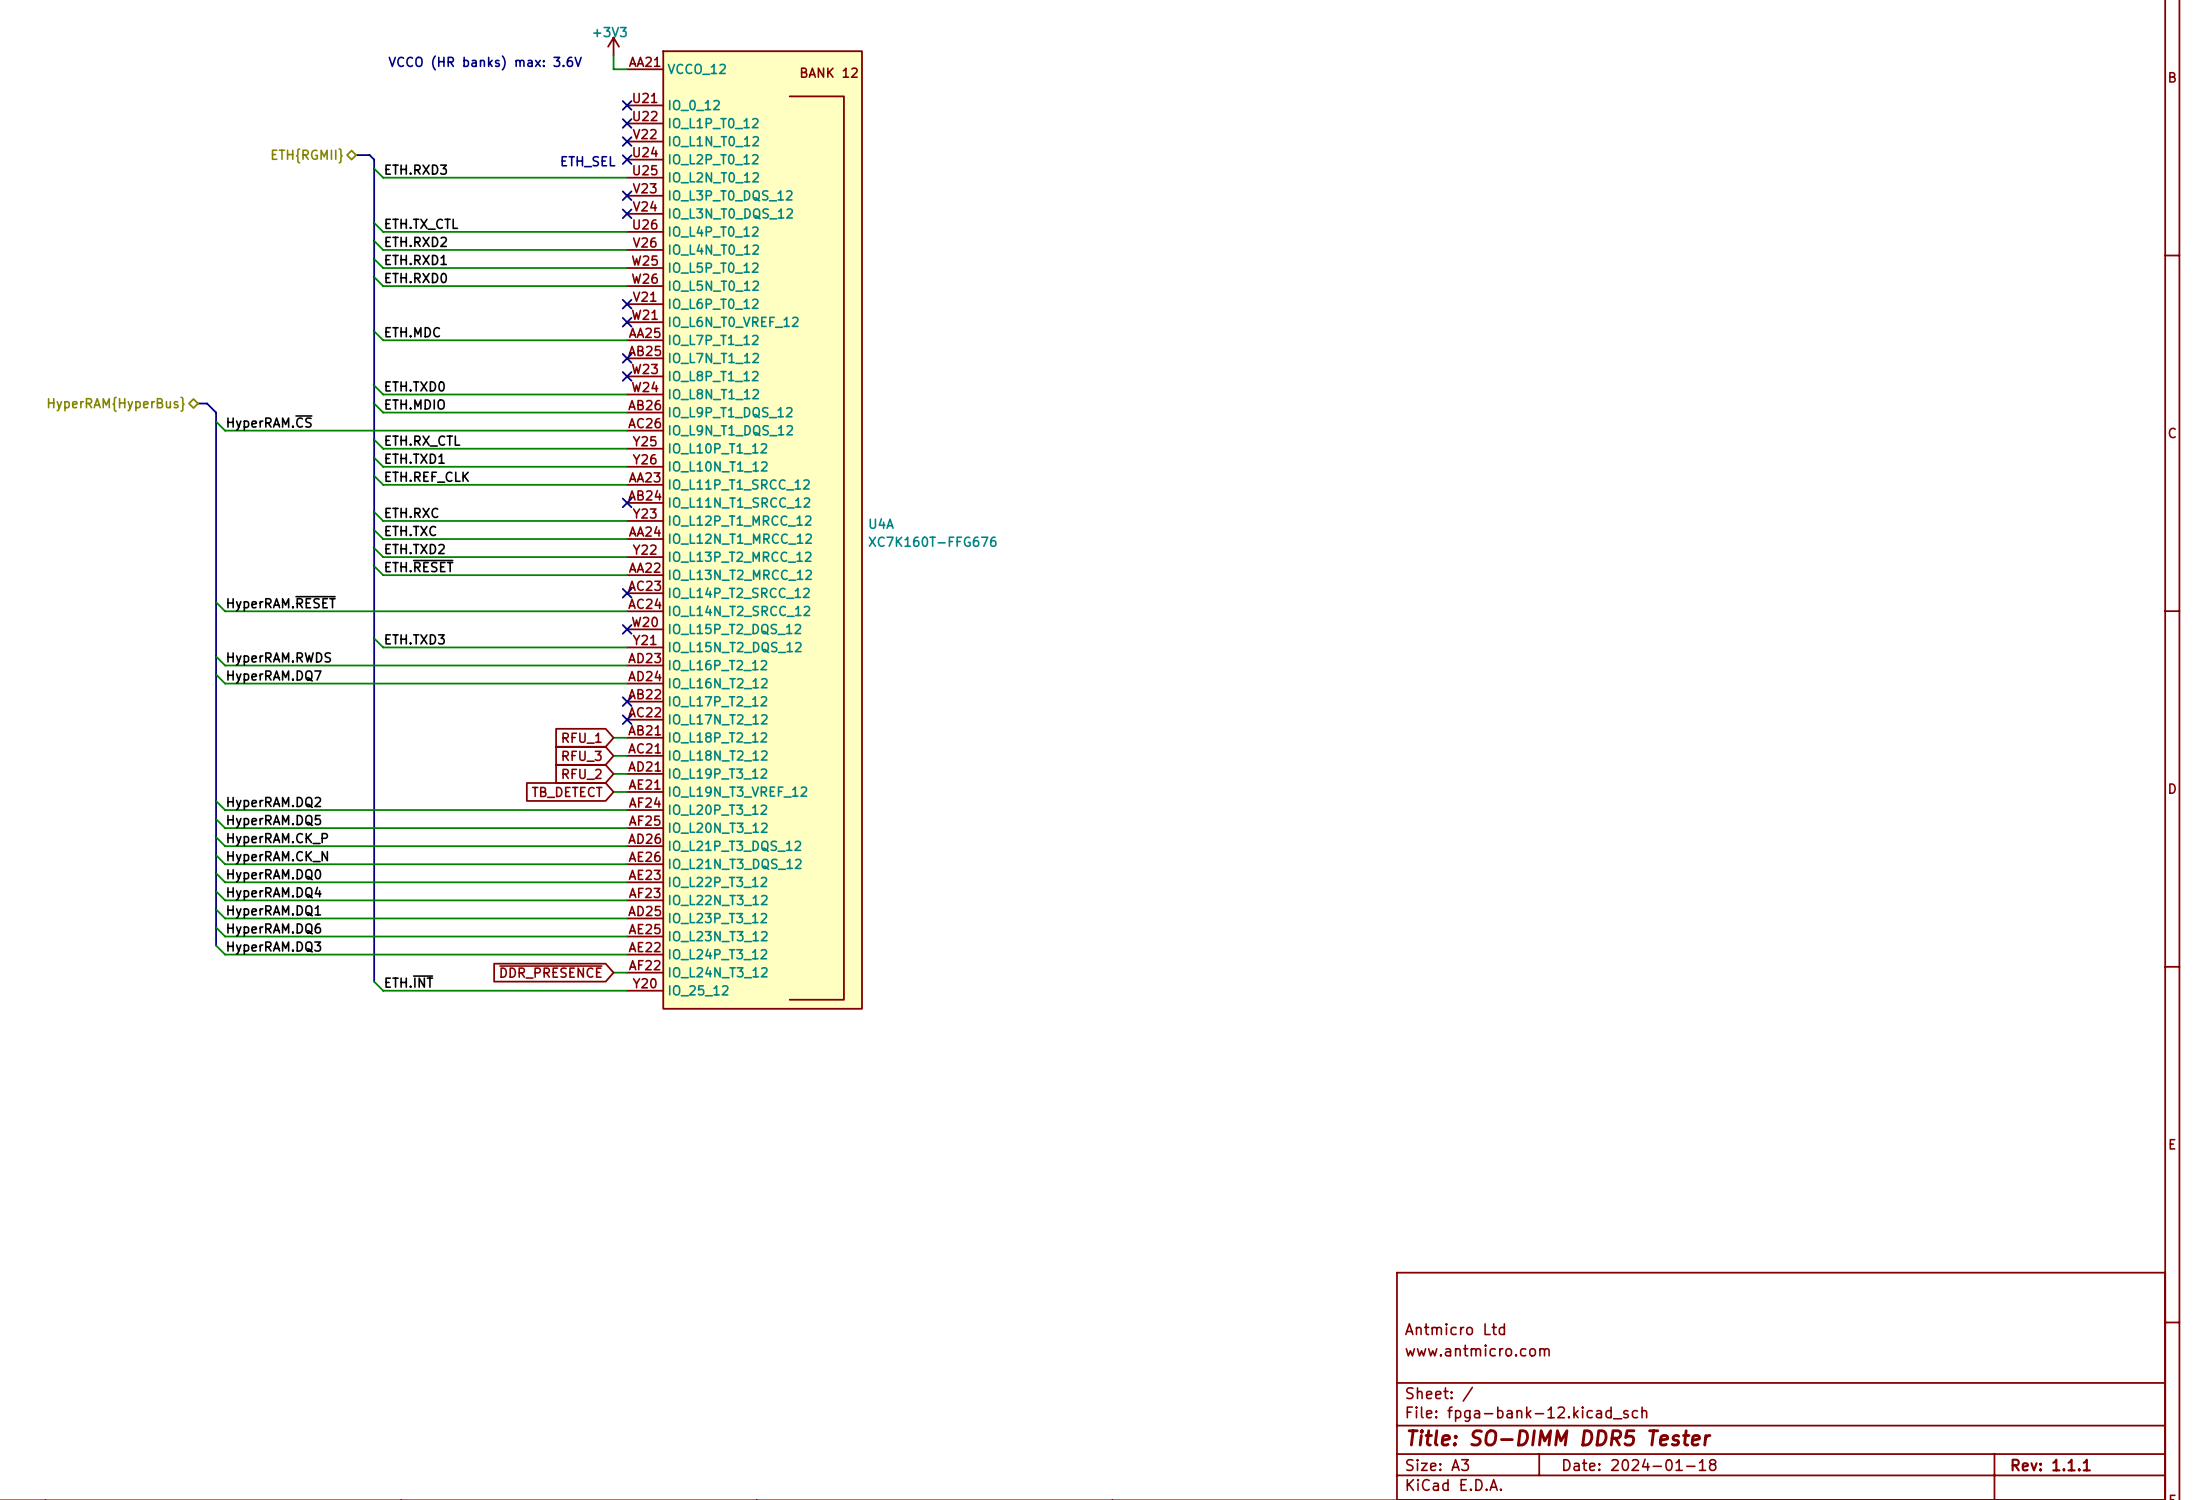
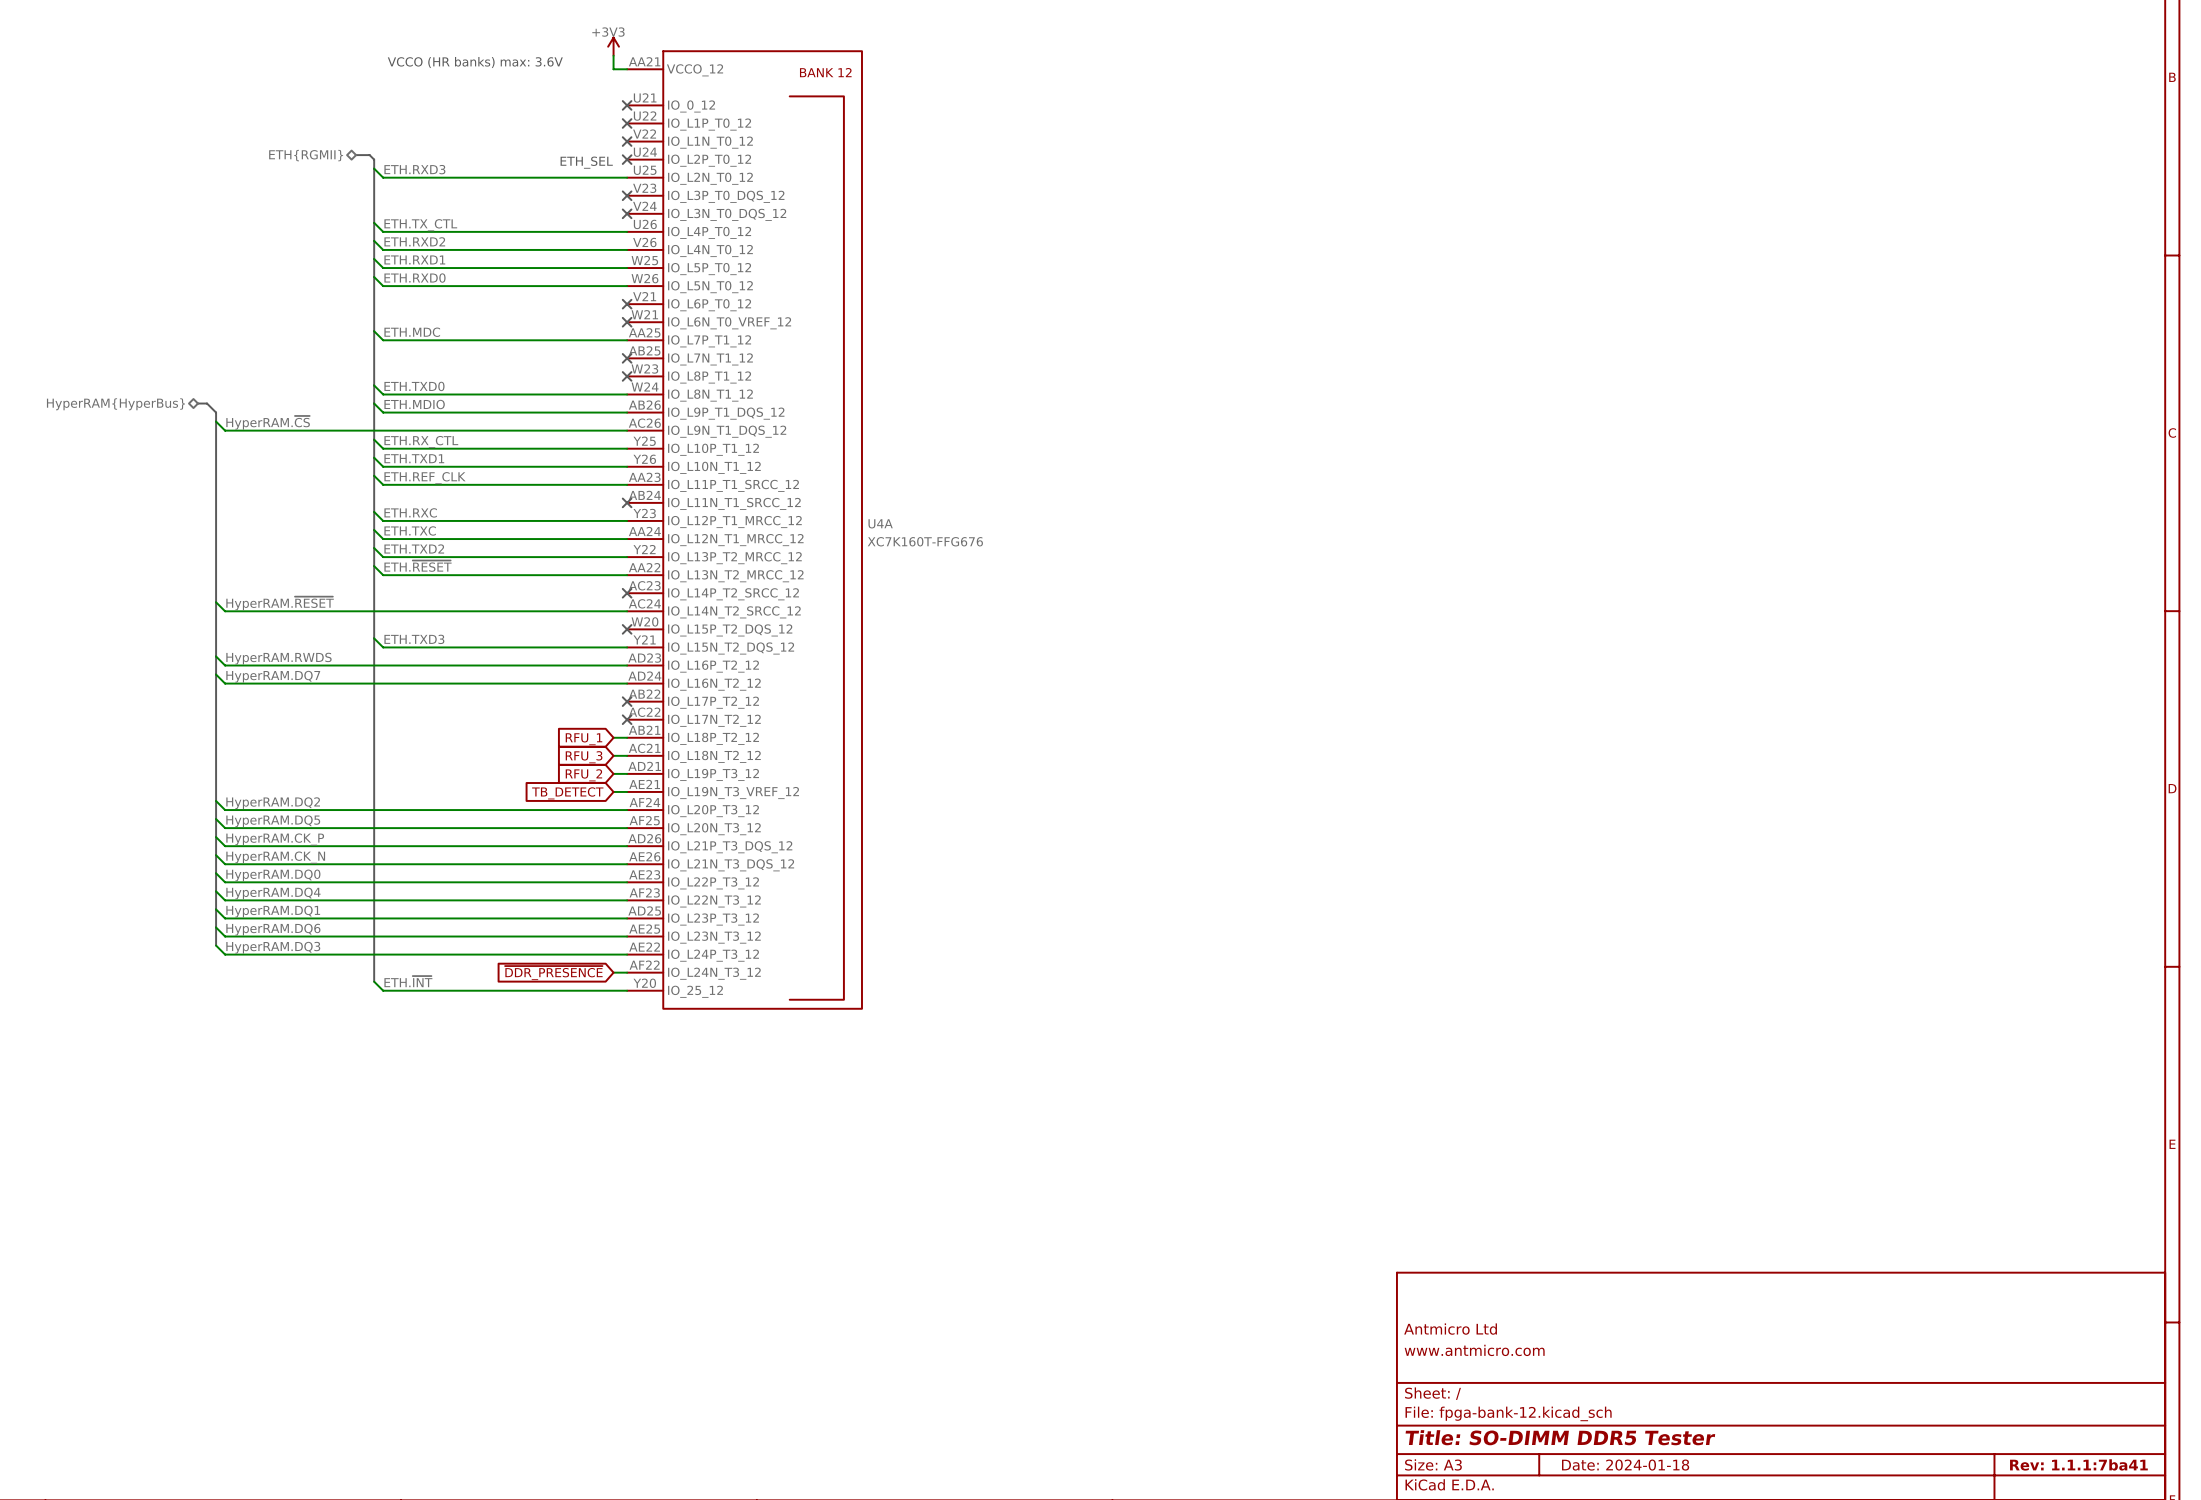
title block: Rev: 1.1.1 (2051, 1465) -> Rev: 1.1.1:7ba41 (2078, 1464)

